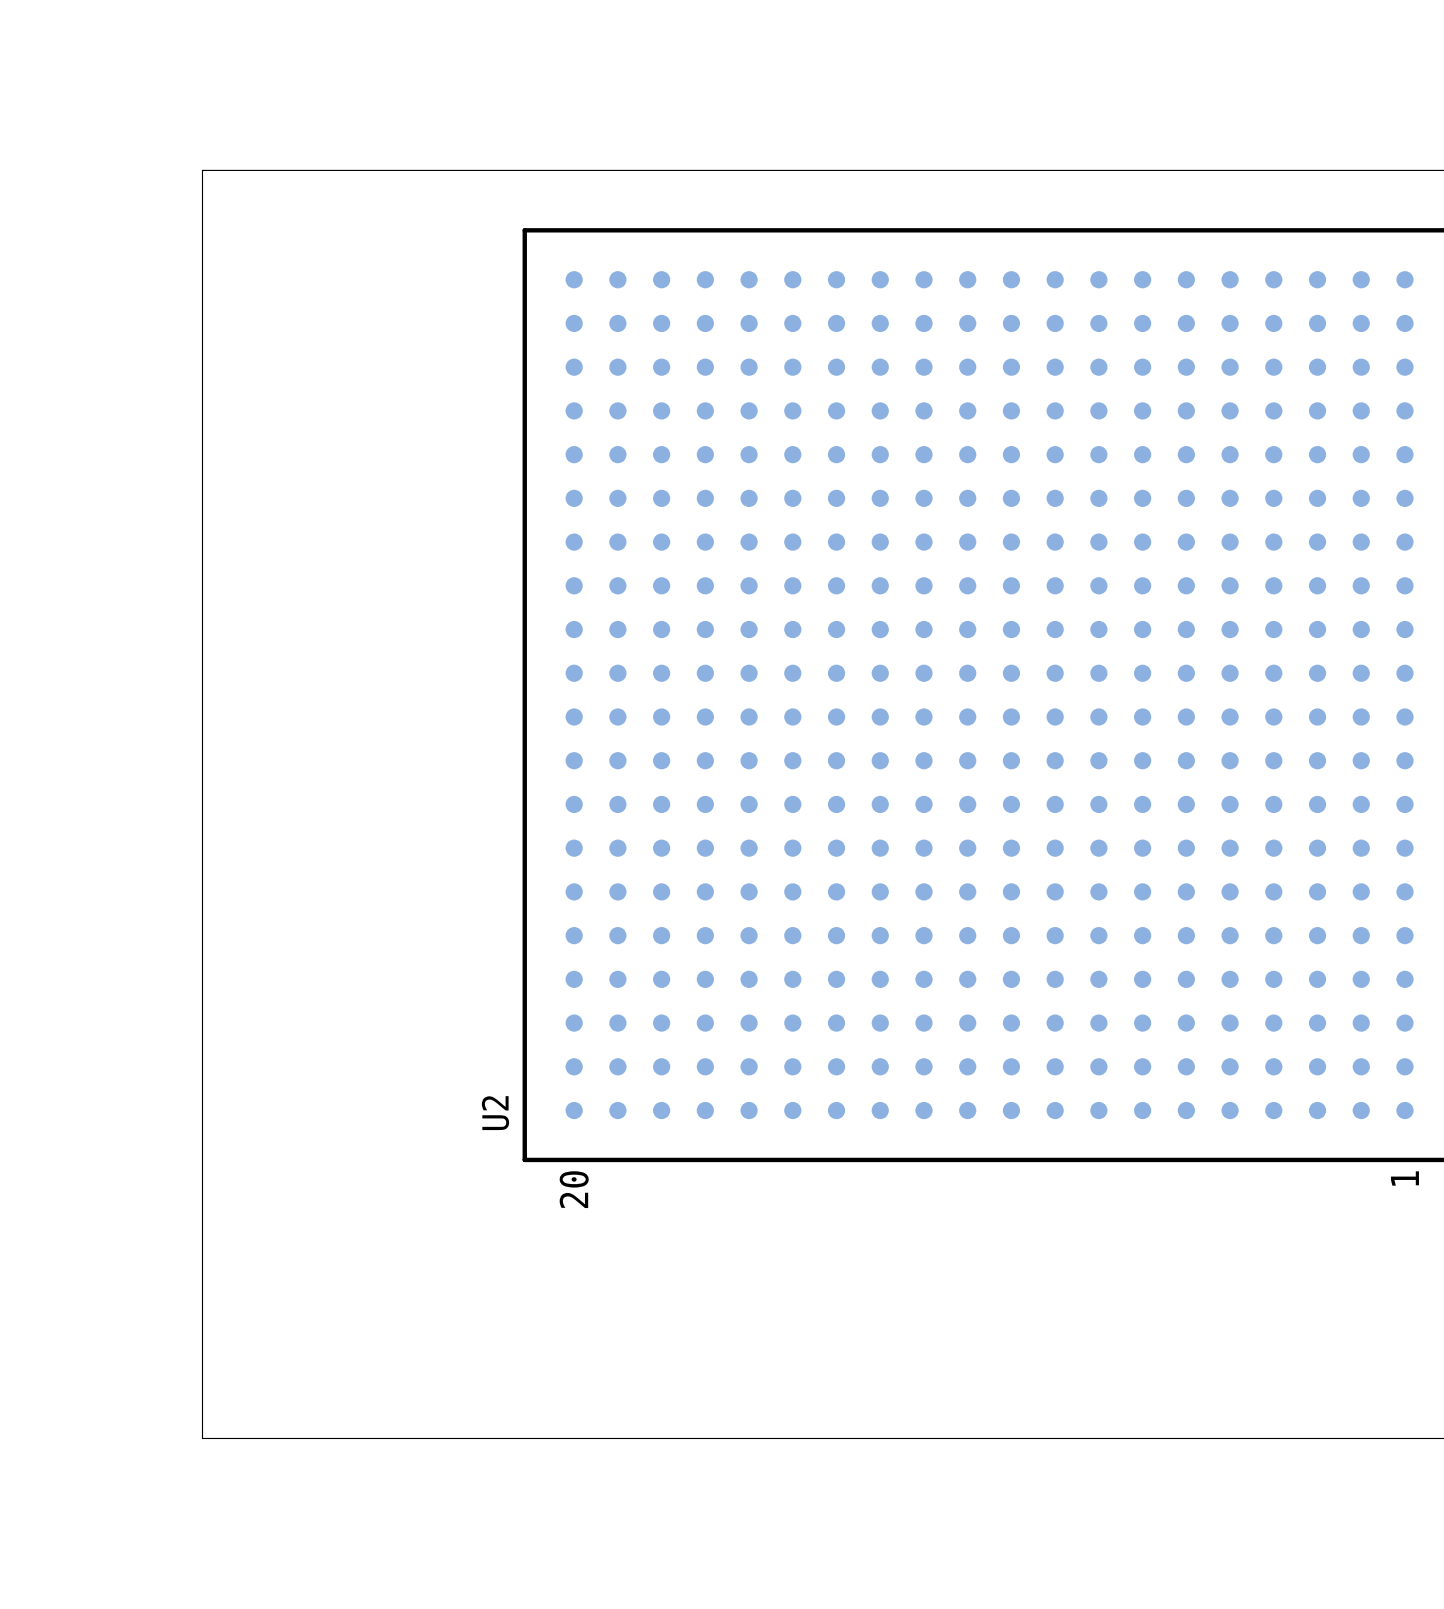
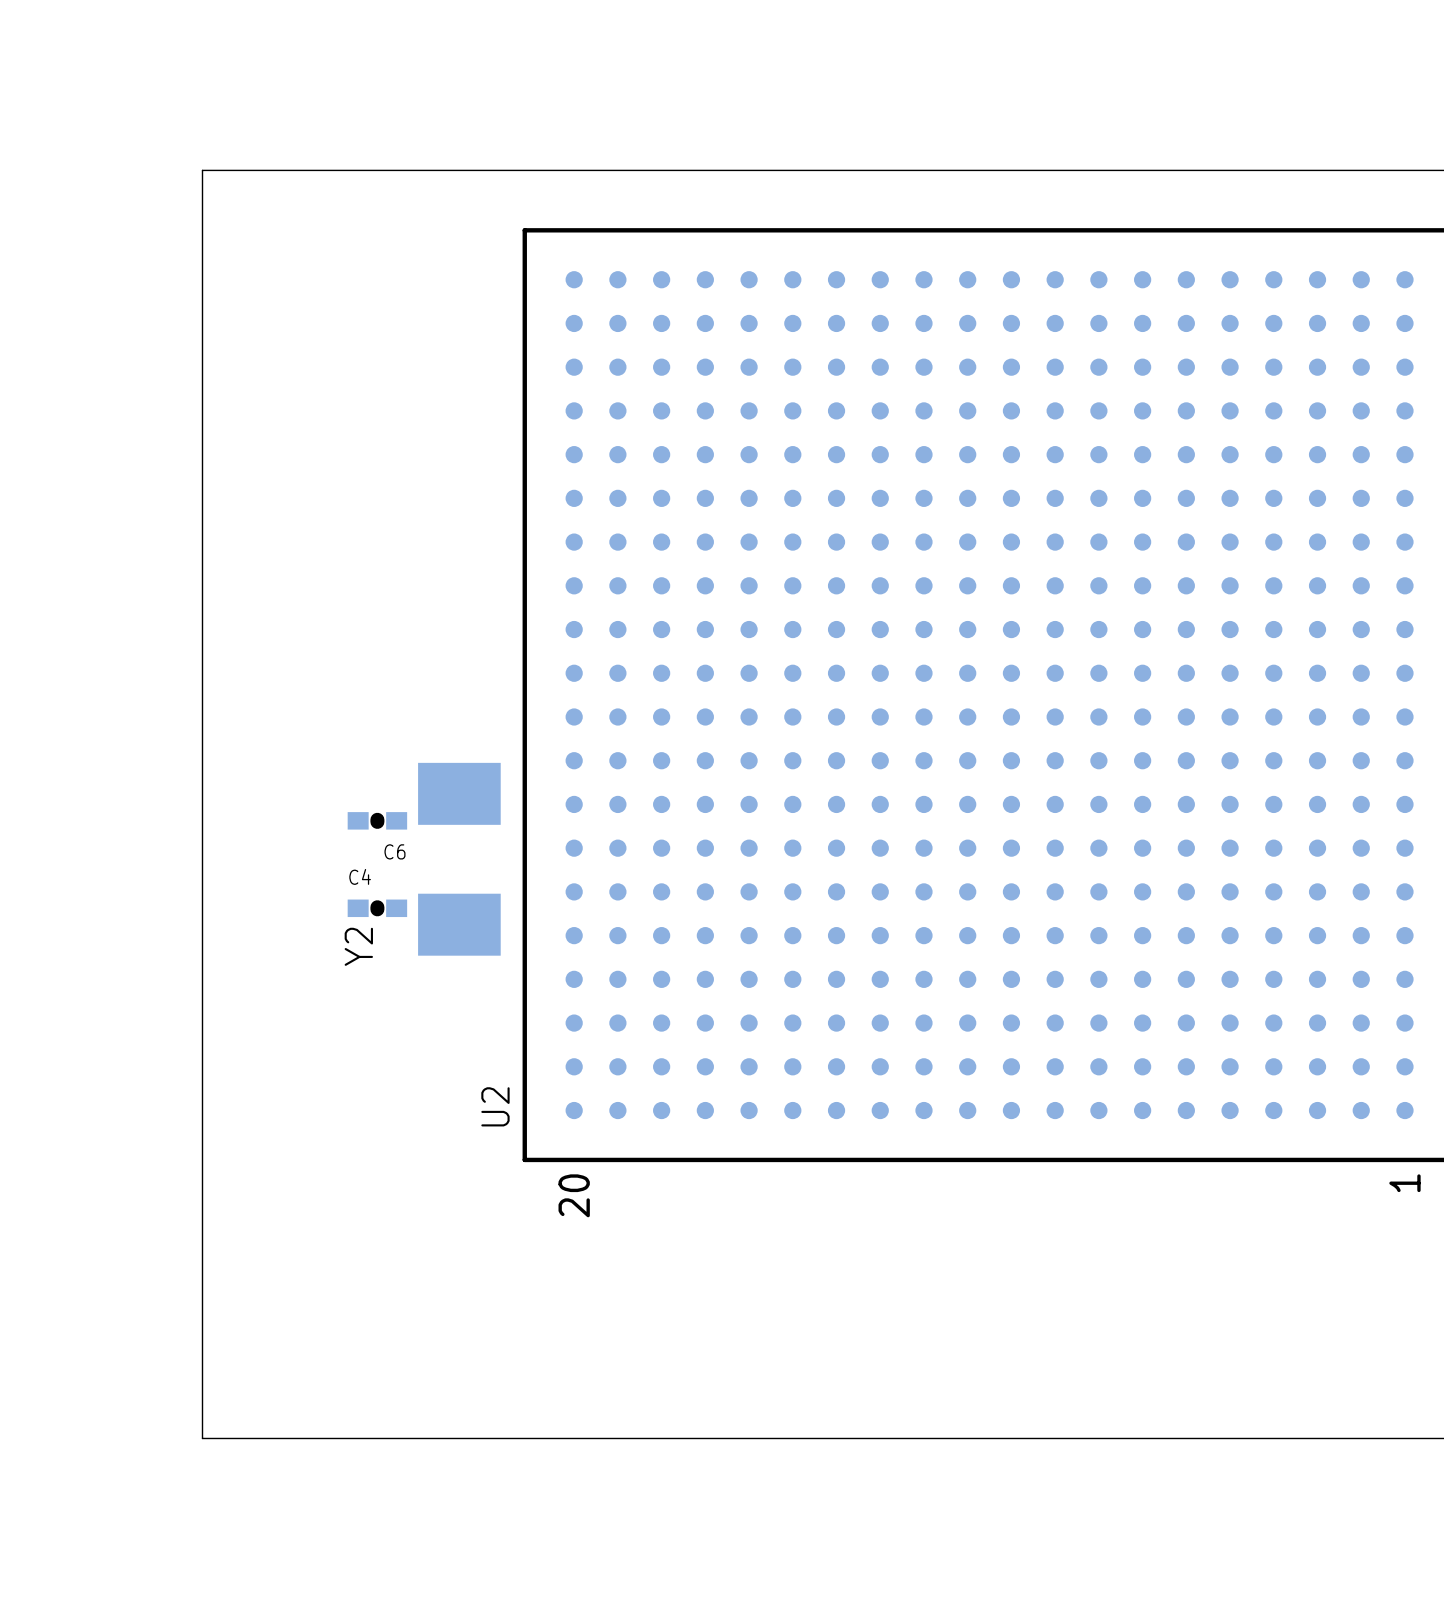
C6: none -> (377, 820)
Y2: none -> (459, 859)
C4: none -> (377, 908)

